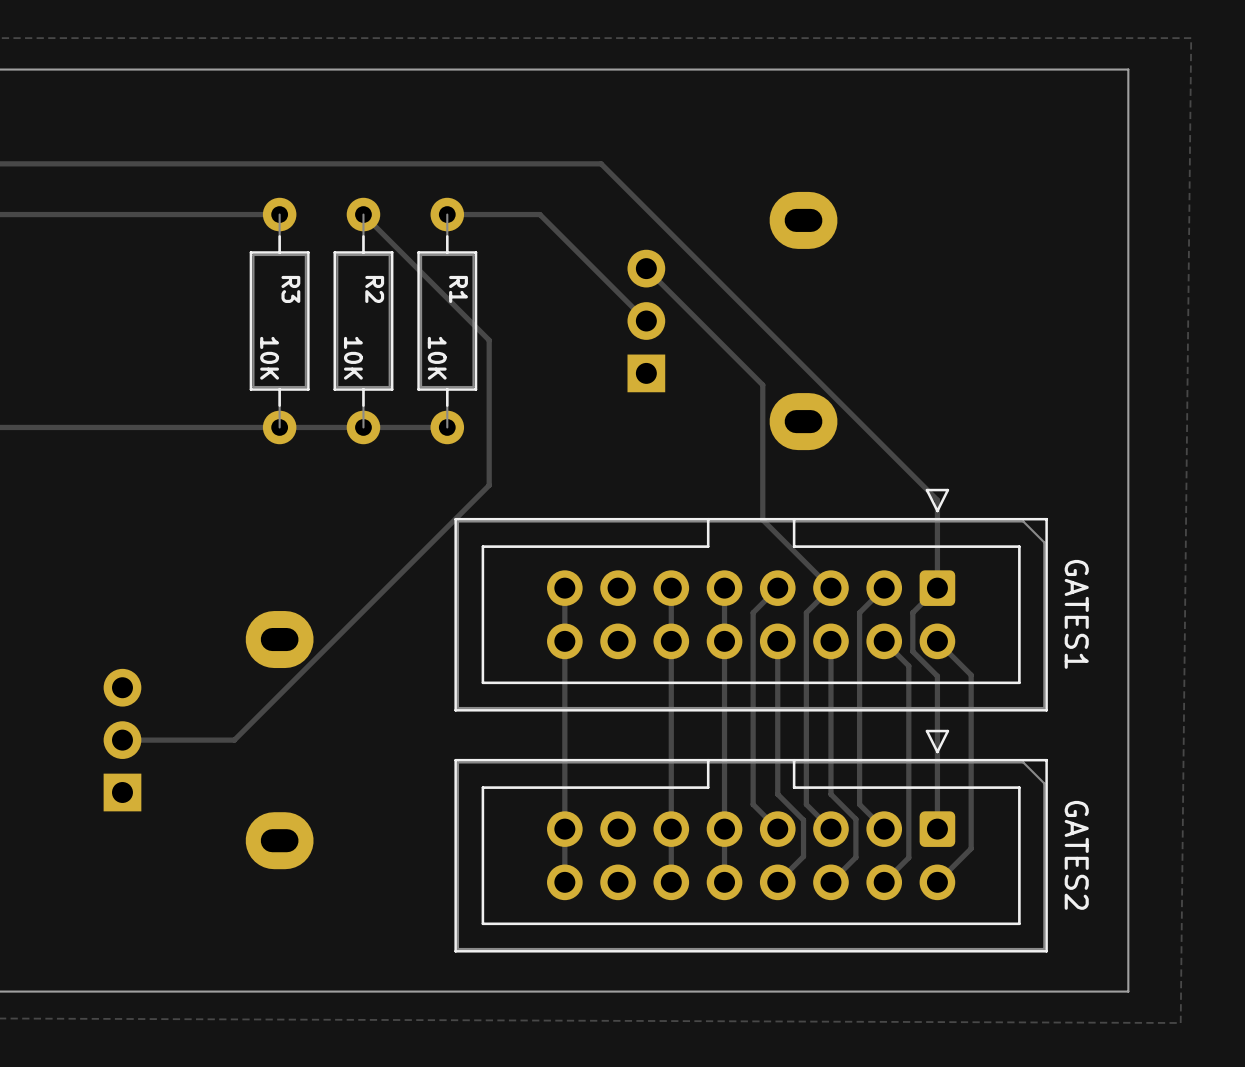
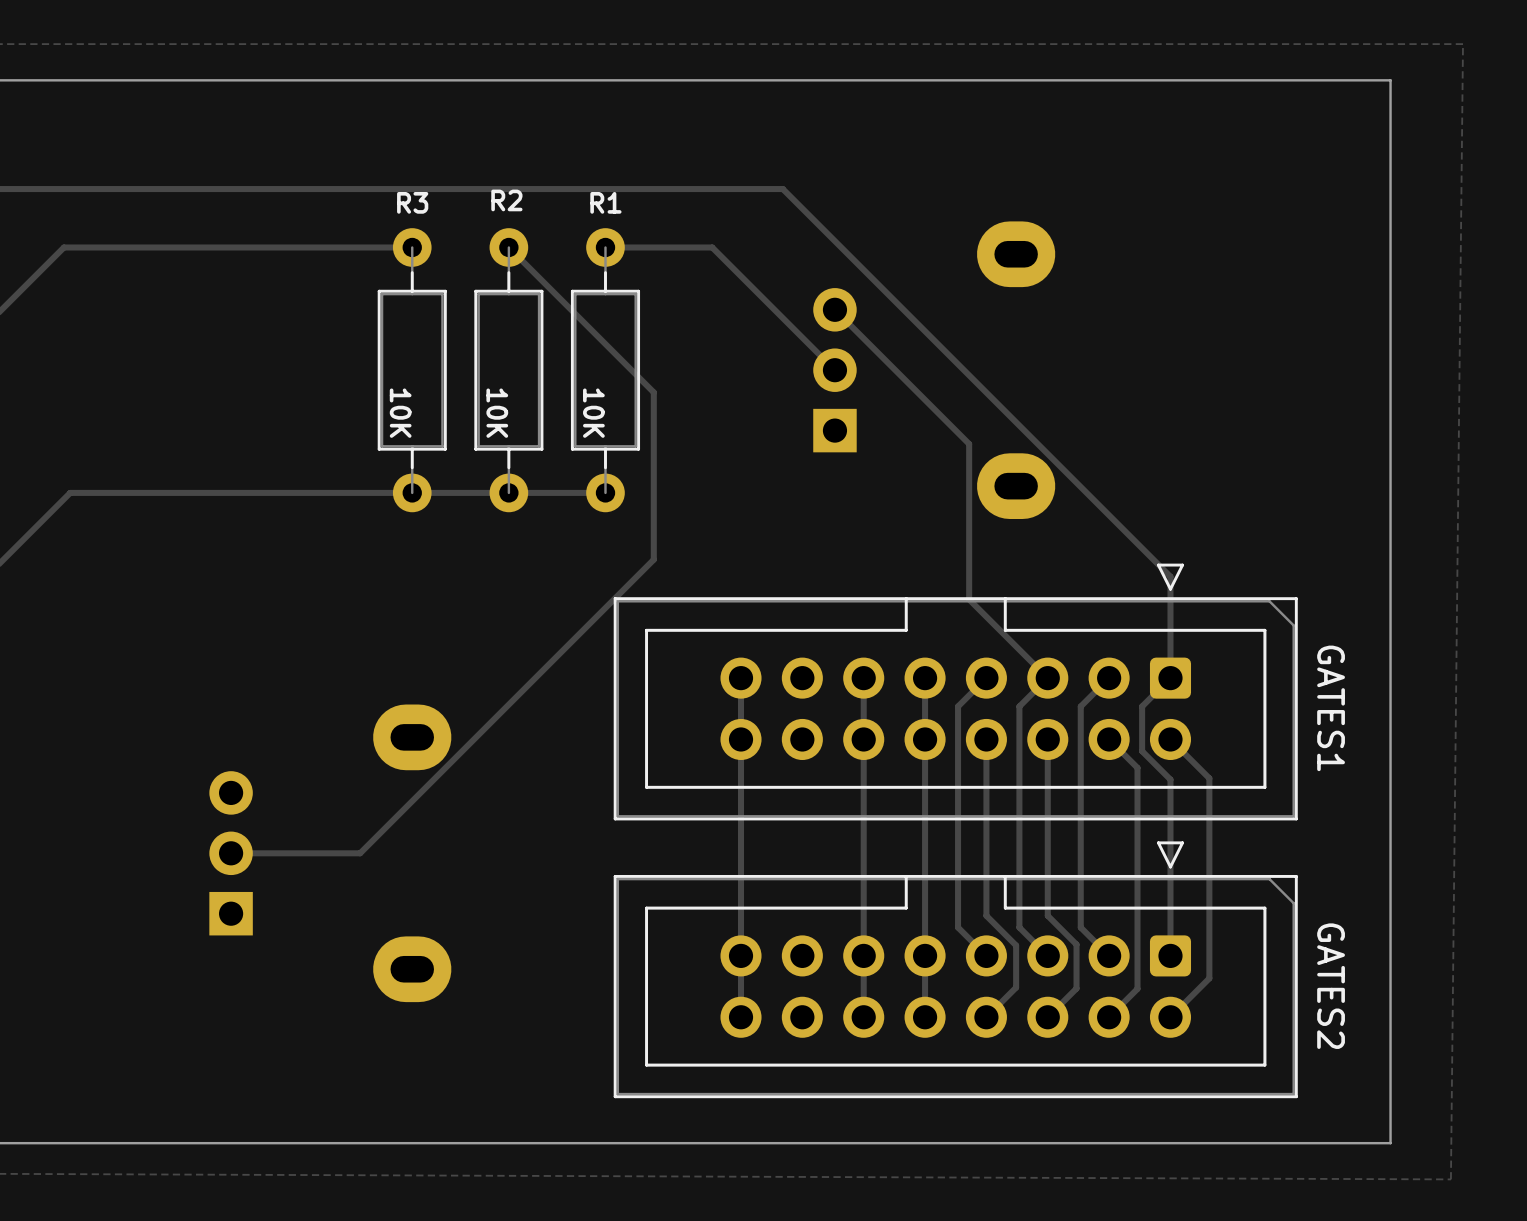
R3 name rotation: 0° (290, 289) -> 90° counterclockwise (412, 202)
R3 name position: R3 (290, 289) -> R3 (412, 202)
R2 name rotation: 0° (374, 289) -> 90° counterclockwise (506, 200)
R2 name position: R2 (374, 289) -> R2 (506, 200)
R1 name rotation: 0° (458, 289) -> 90° counterclockwise (605, 202)
R1 name position: R1 (458, 289) -> R1 (605, 202)

